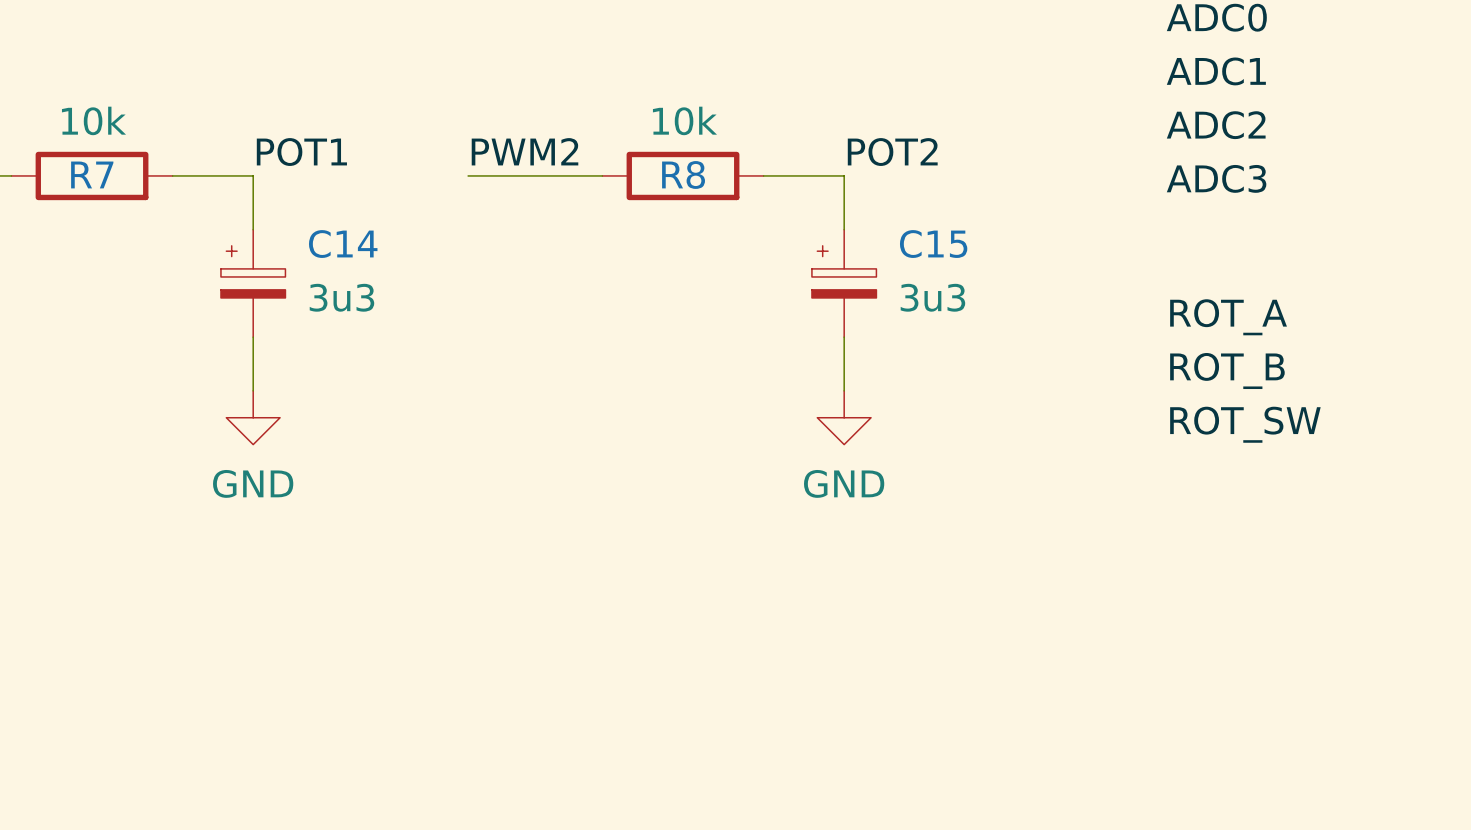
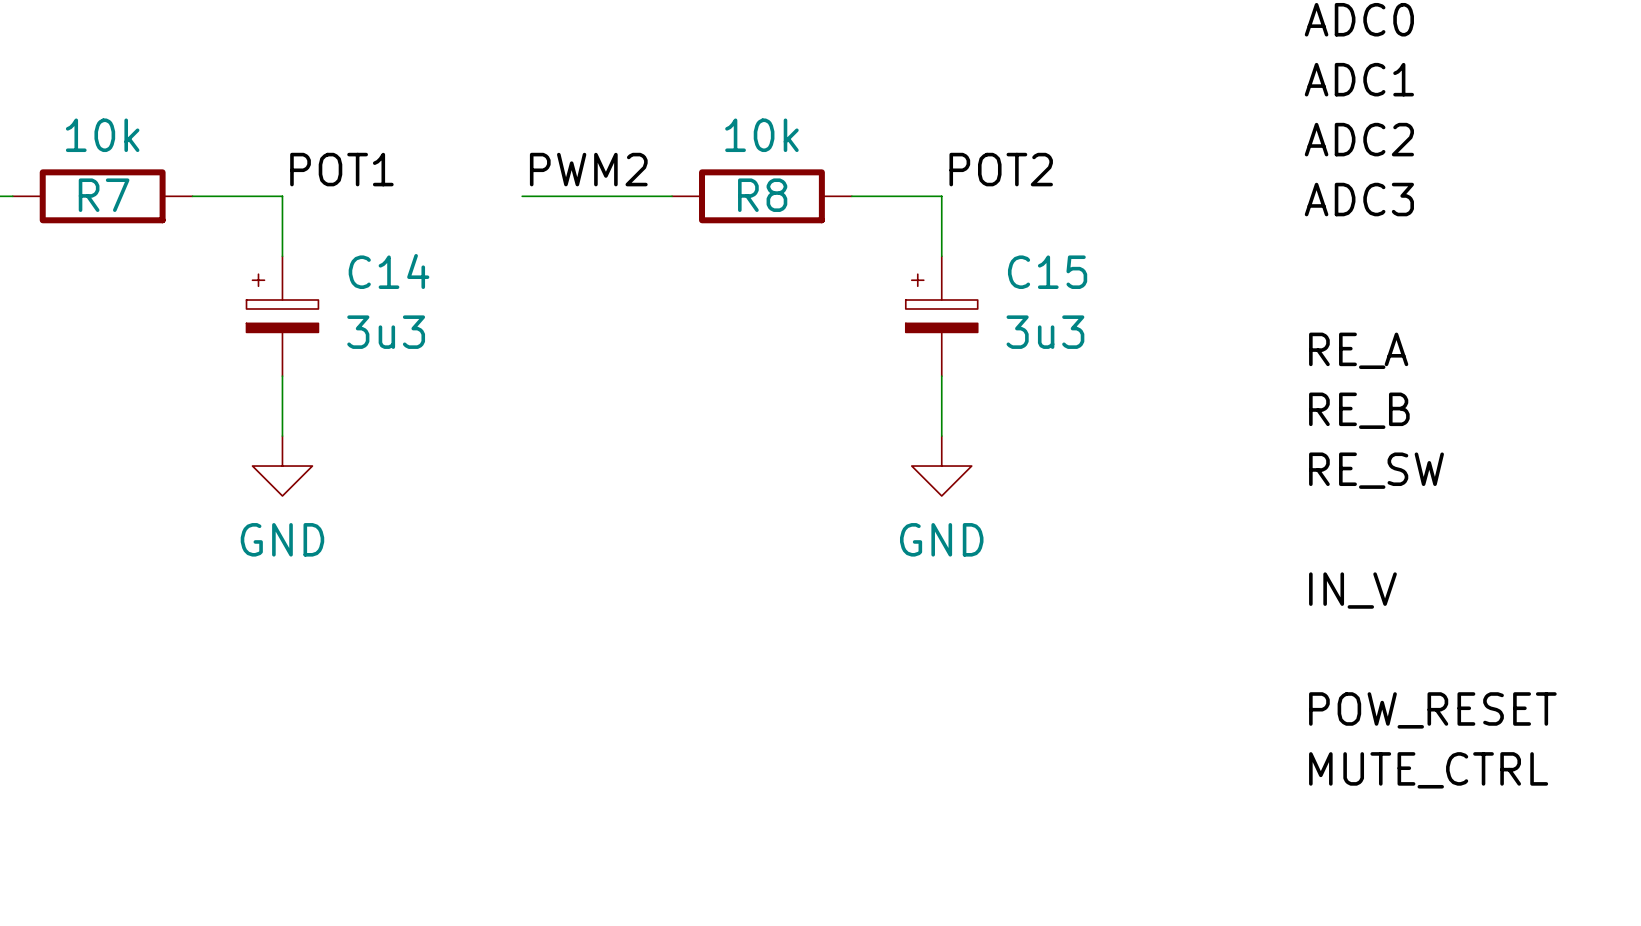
label: ROT_A (1228, 317) -> RE_A (1358, 350)
label: ROT_B (1227, 371) -> RE_B (1359, 410)
label: ROT_SW (1245, 424) -> RE_SW (1376, 470)
label: none -> IN_V (1352, 590)
label: none -> POW_RESET (1432, 710)
label: none -> MUTE_CTRL (1428, 770)

